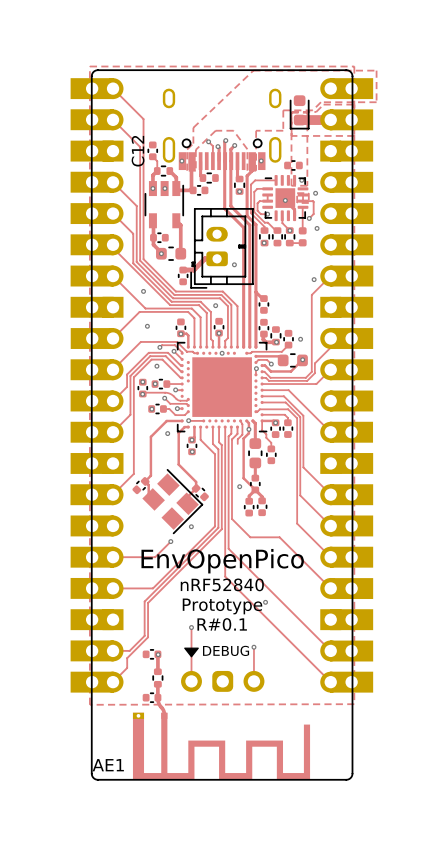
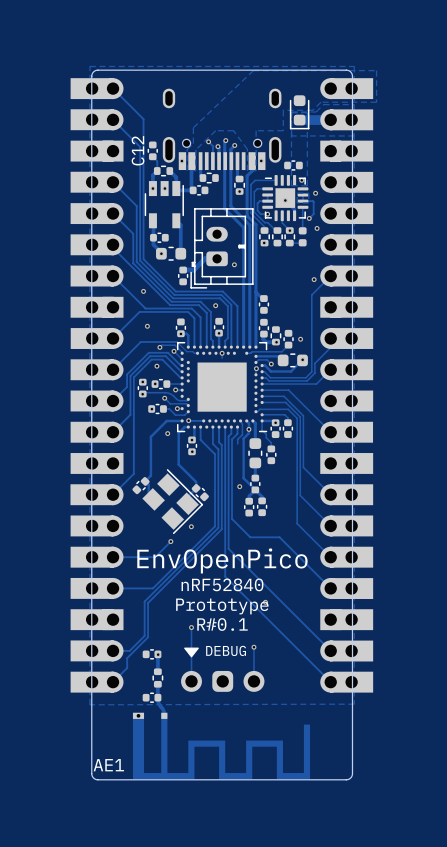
part footprint: [176, 341, 268, 433] -> [176, 341, 268, 433]
track: none -> (222, 353) (222, 358)

